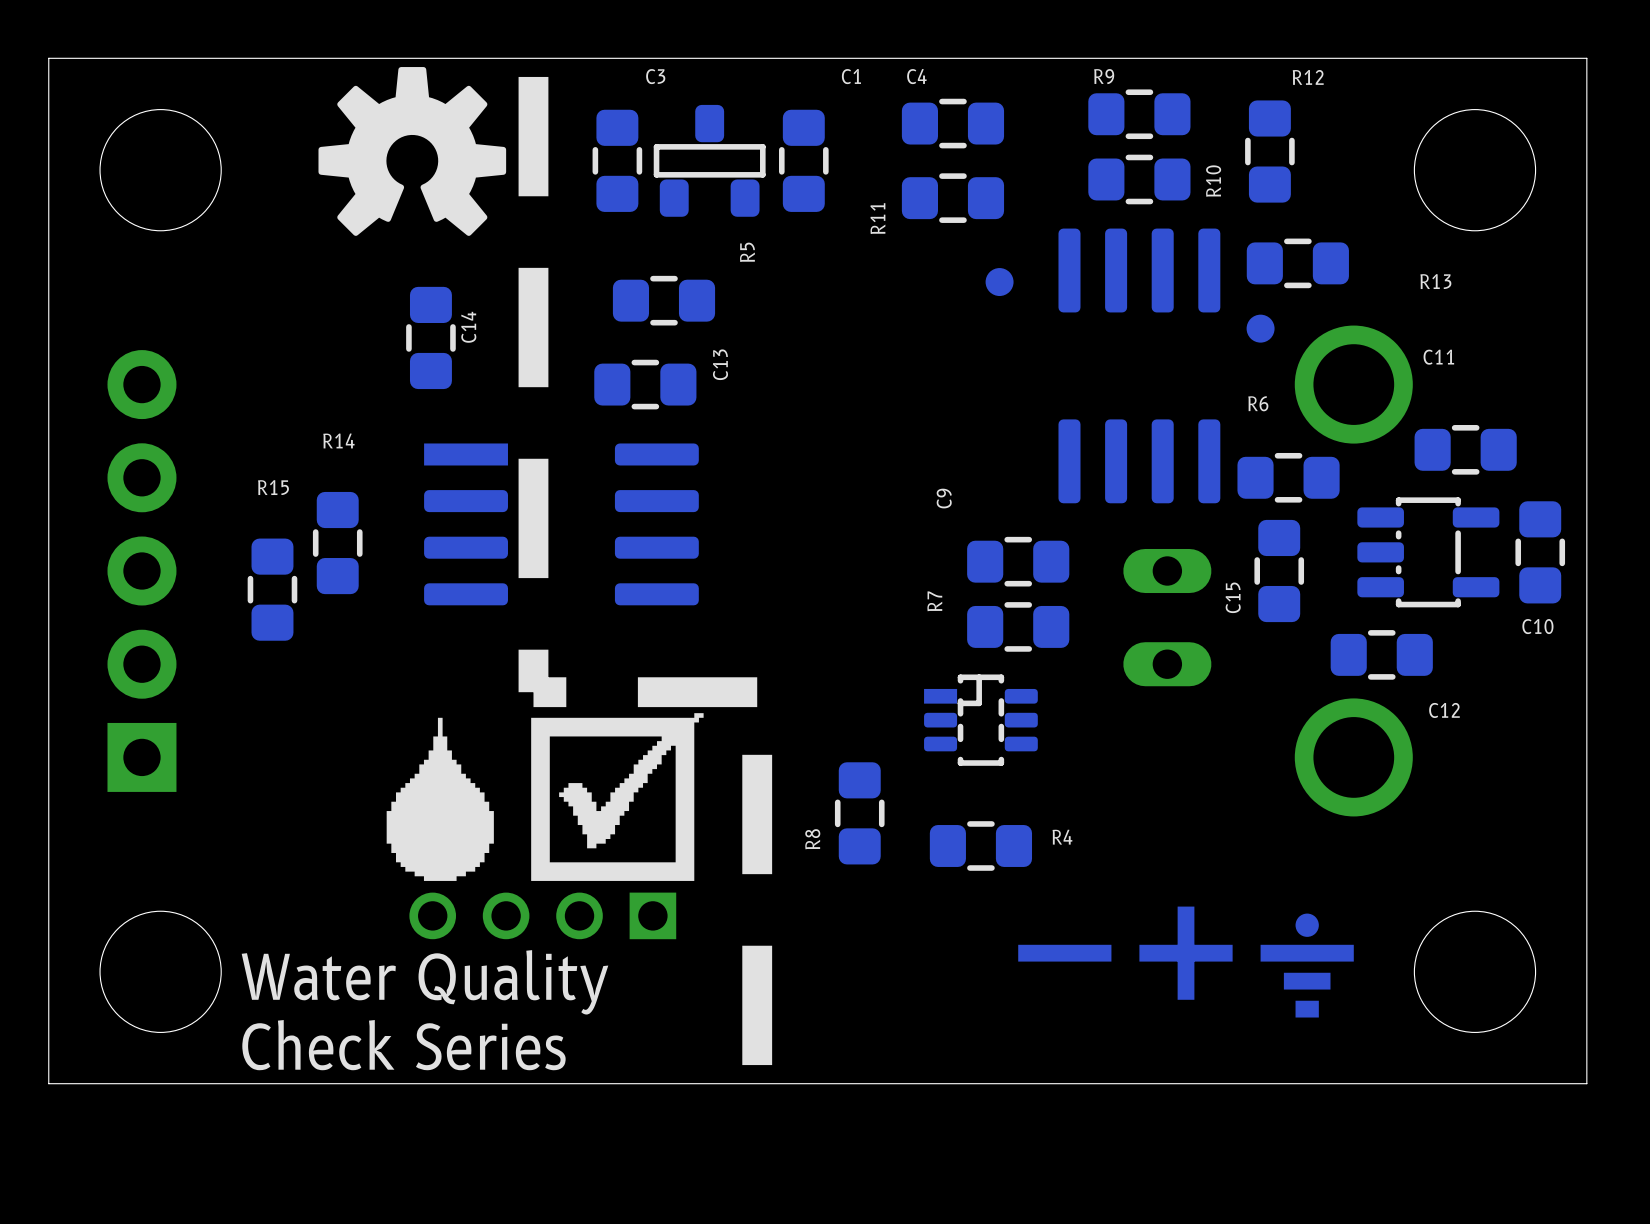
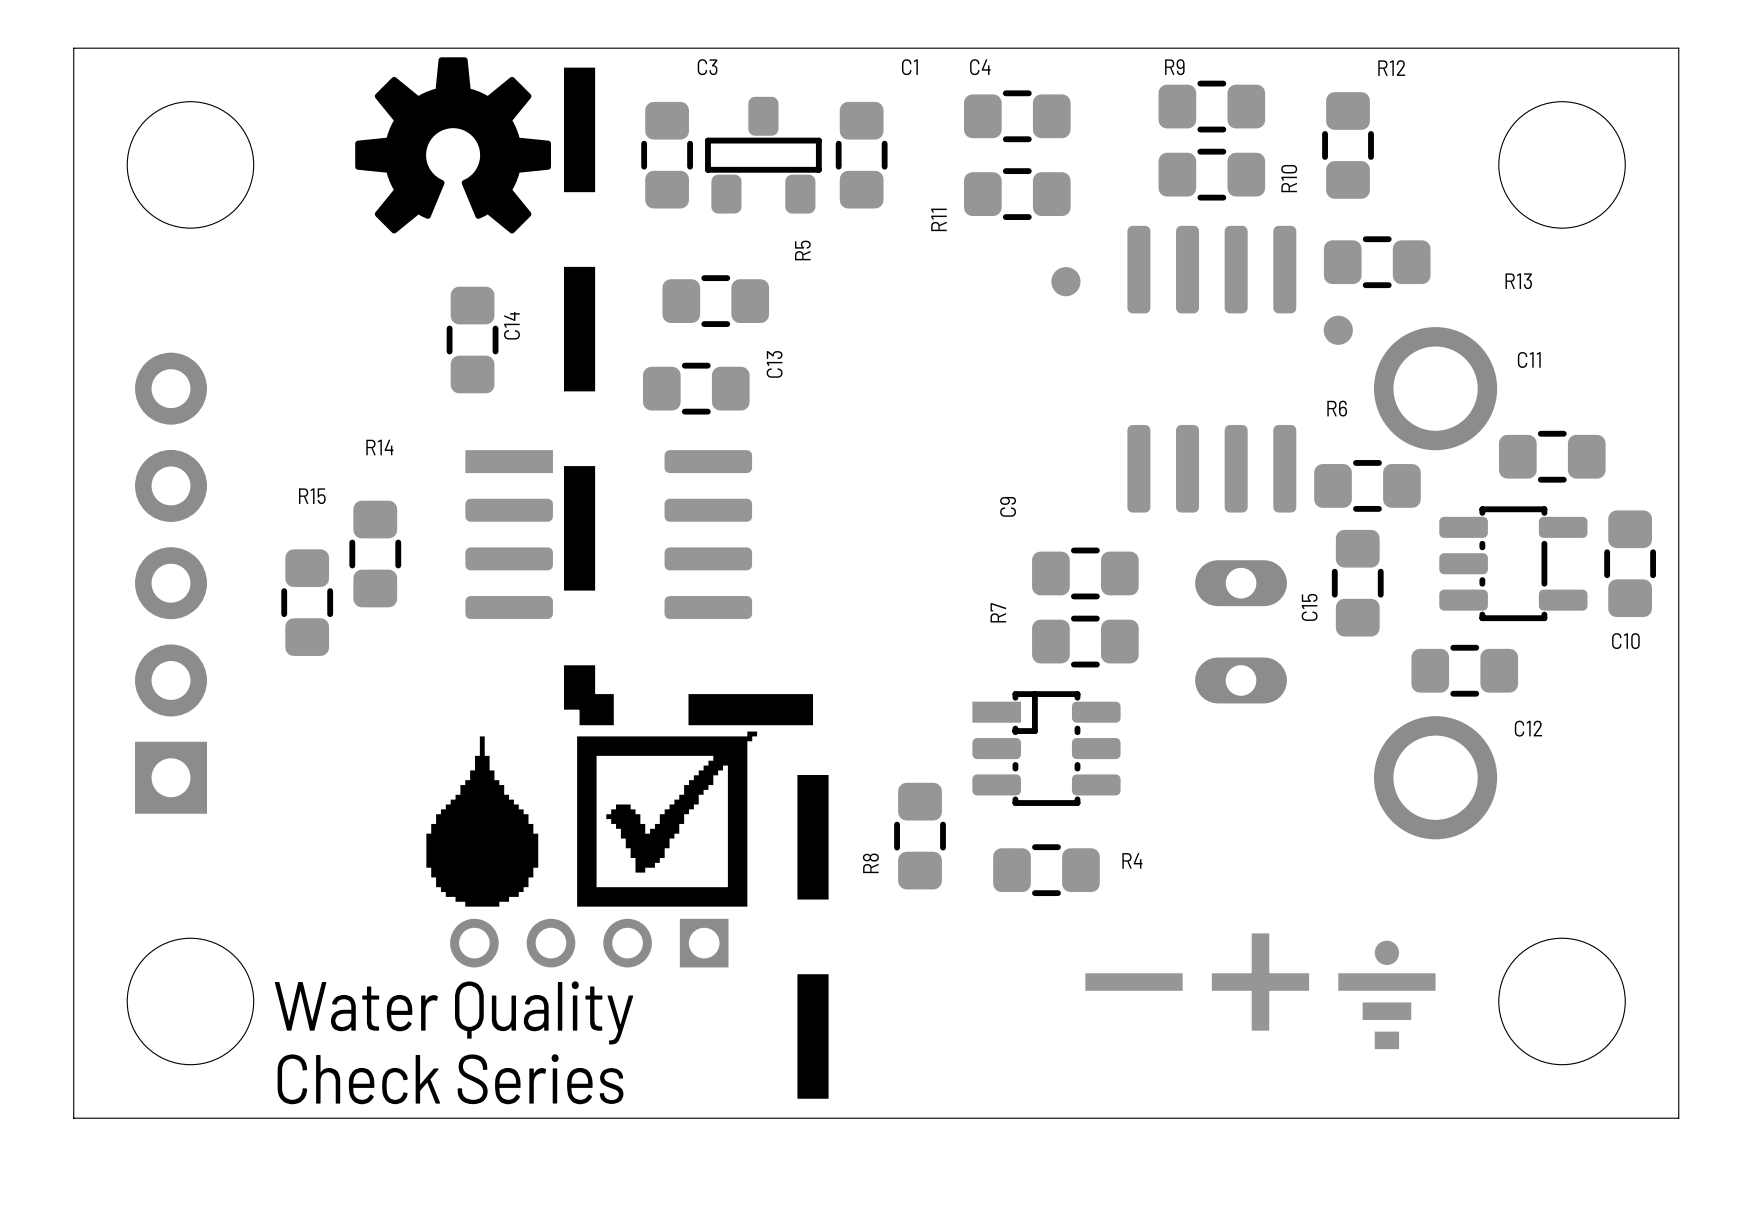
part footprint: [924, 674, 1038, 766] -> [972, 691, 1121, 806]

